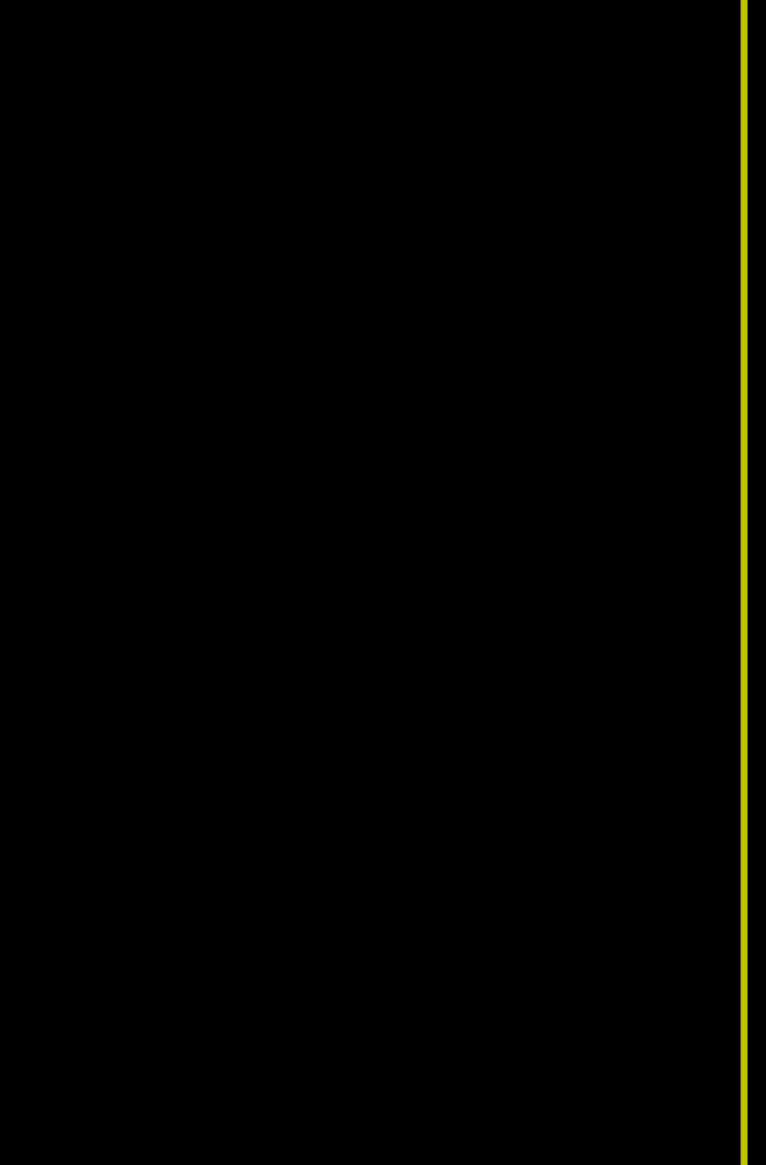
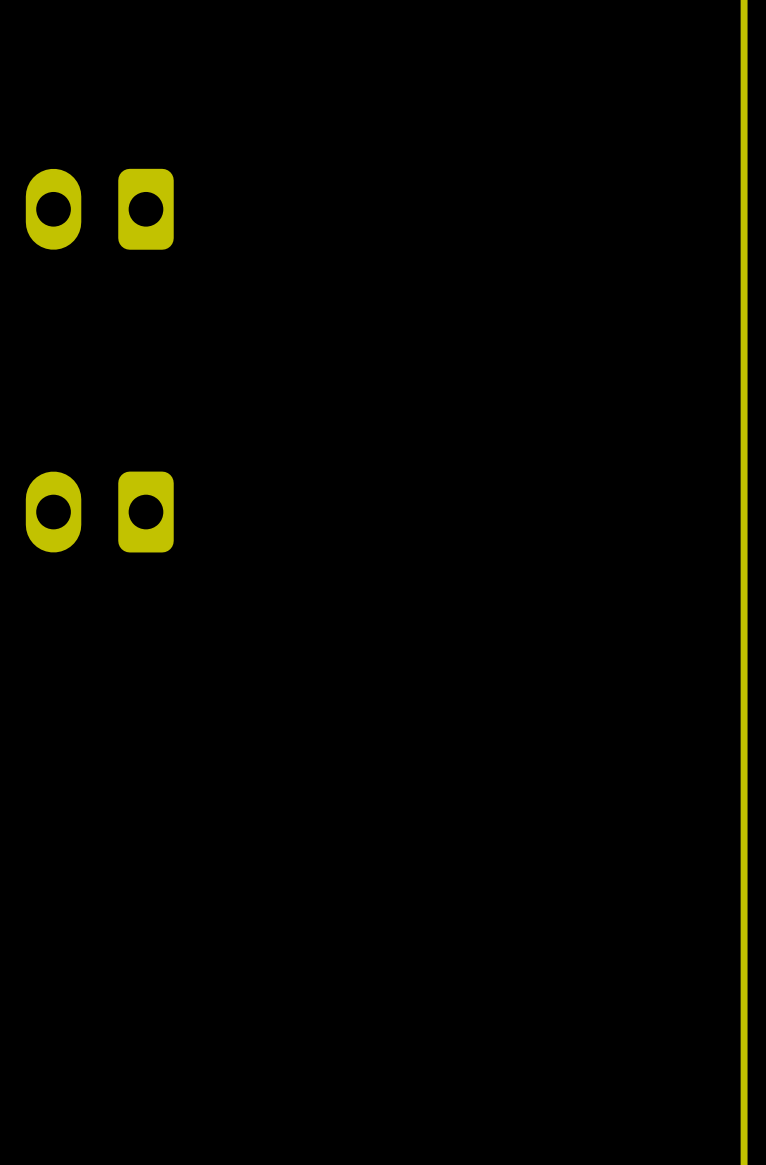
part: none -> (99, 209)
part: none -> (99, 512)

